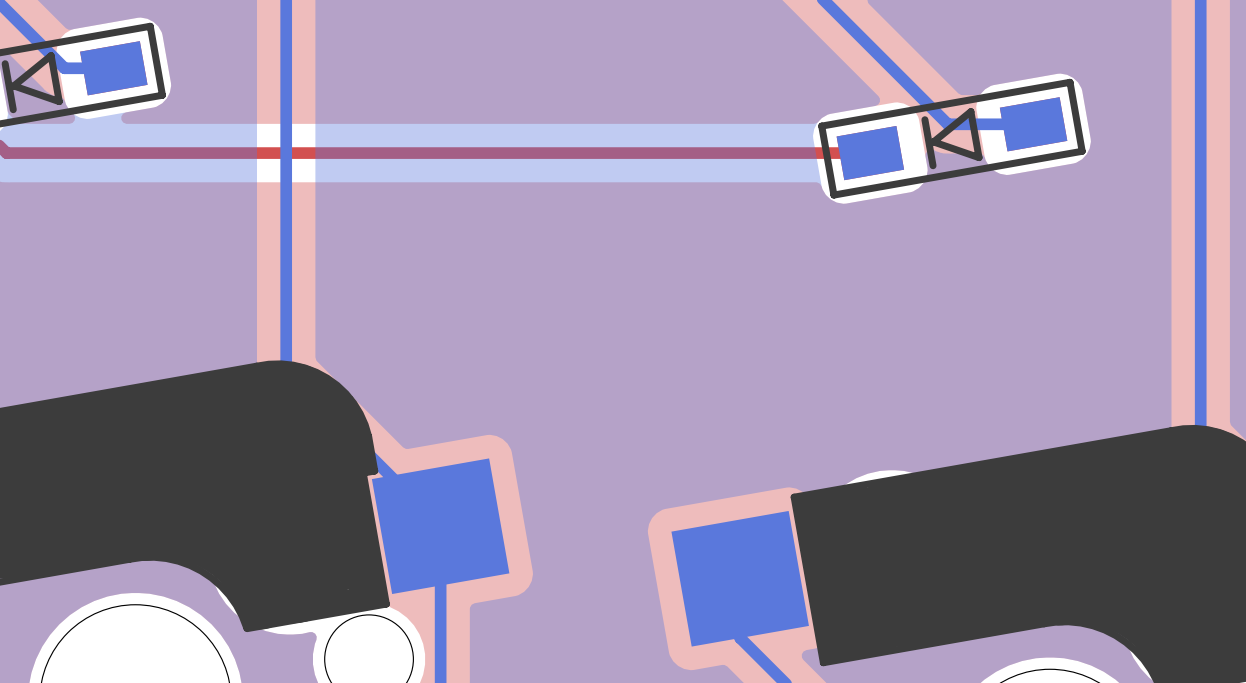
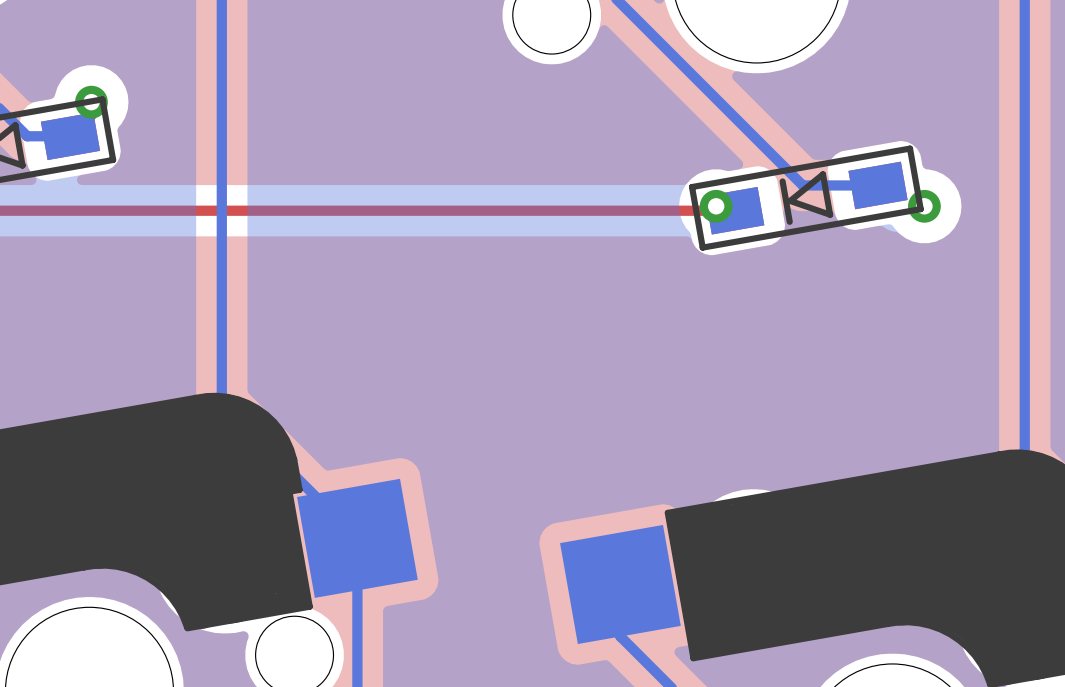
via: none -> (91, 102)
via: none -> (716, 206)
via: none -> (924, 206)

